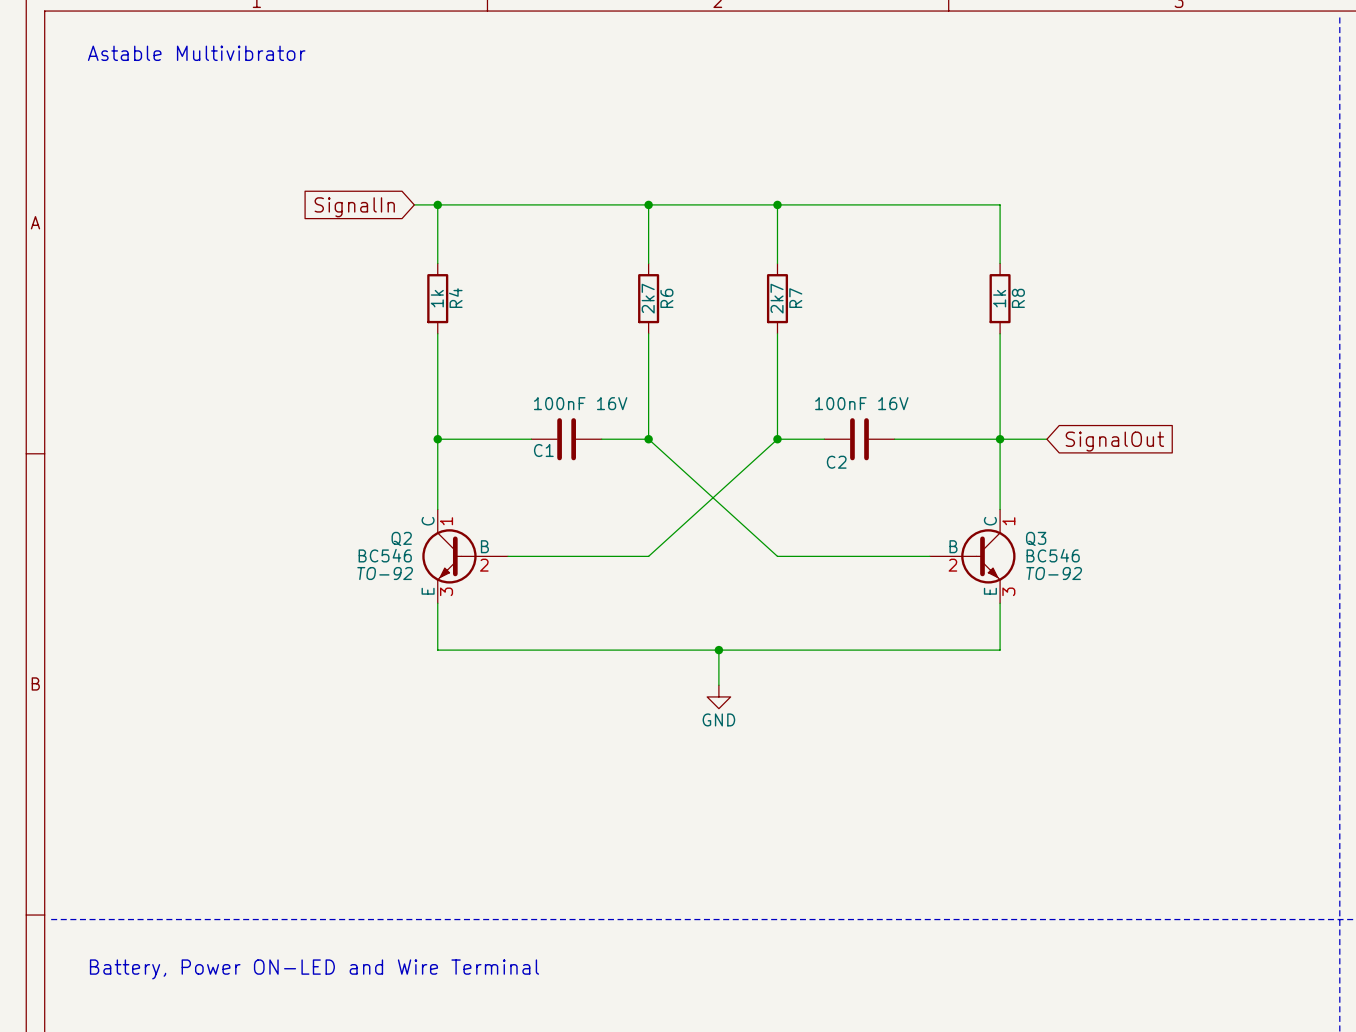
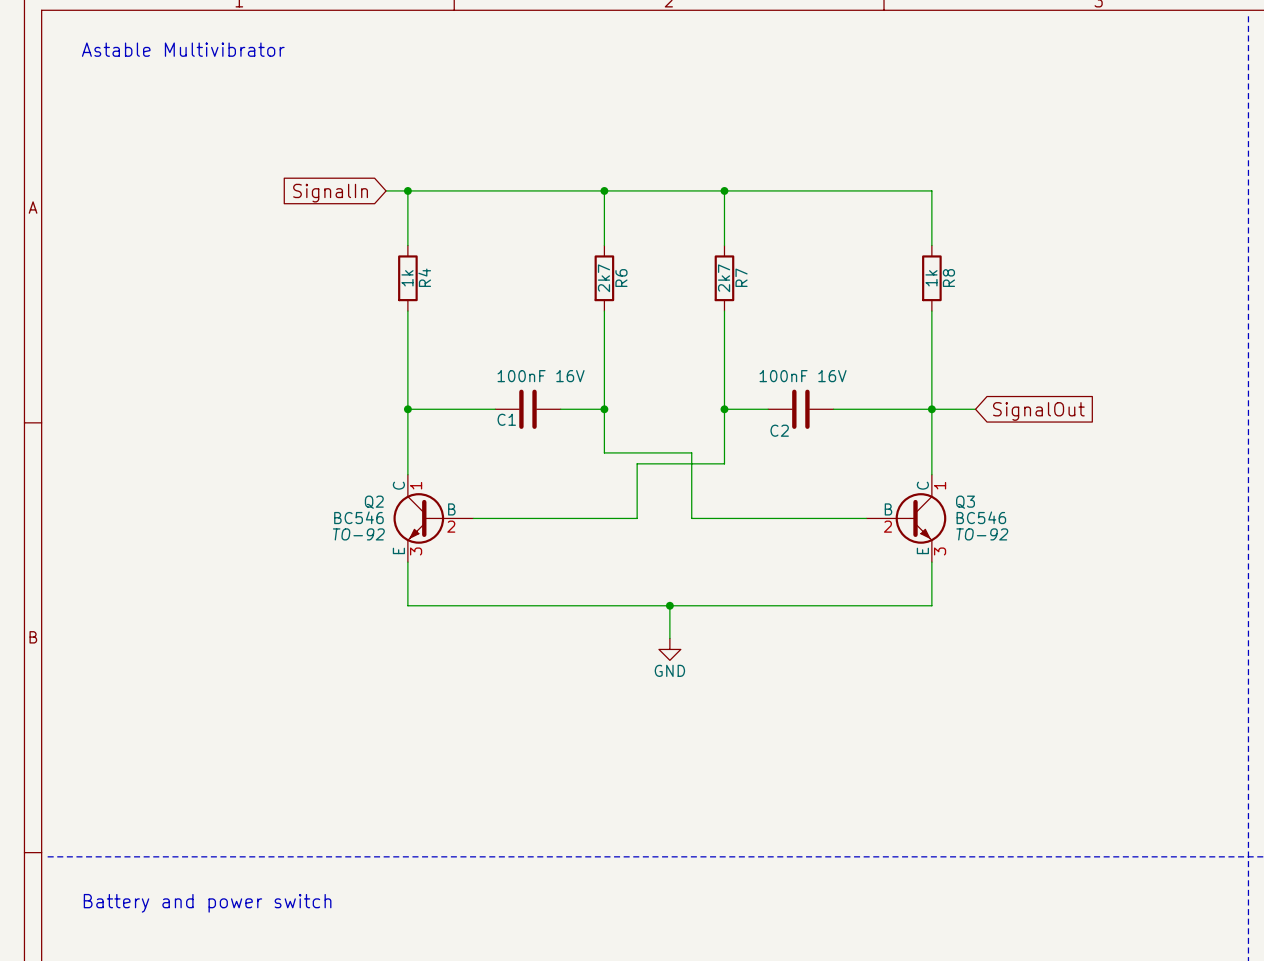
wire: (648, 439) (777, 556) -> (604, 409) (604, 452) (691, 452) (691, 518) (724, 518)
wire: (777, 439) (648, 556) -> (724, 409) (724, 463) (637, 463) (637, 518) (604, 518)
text: Battery, Power ON-LED and Wire Terminal (314, 969) -> Battery and power switch (207, 903)

